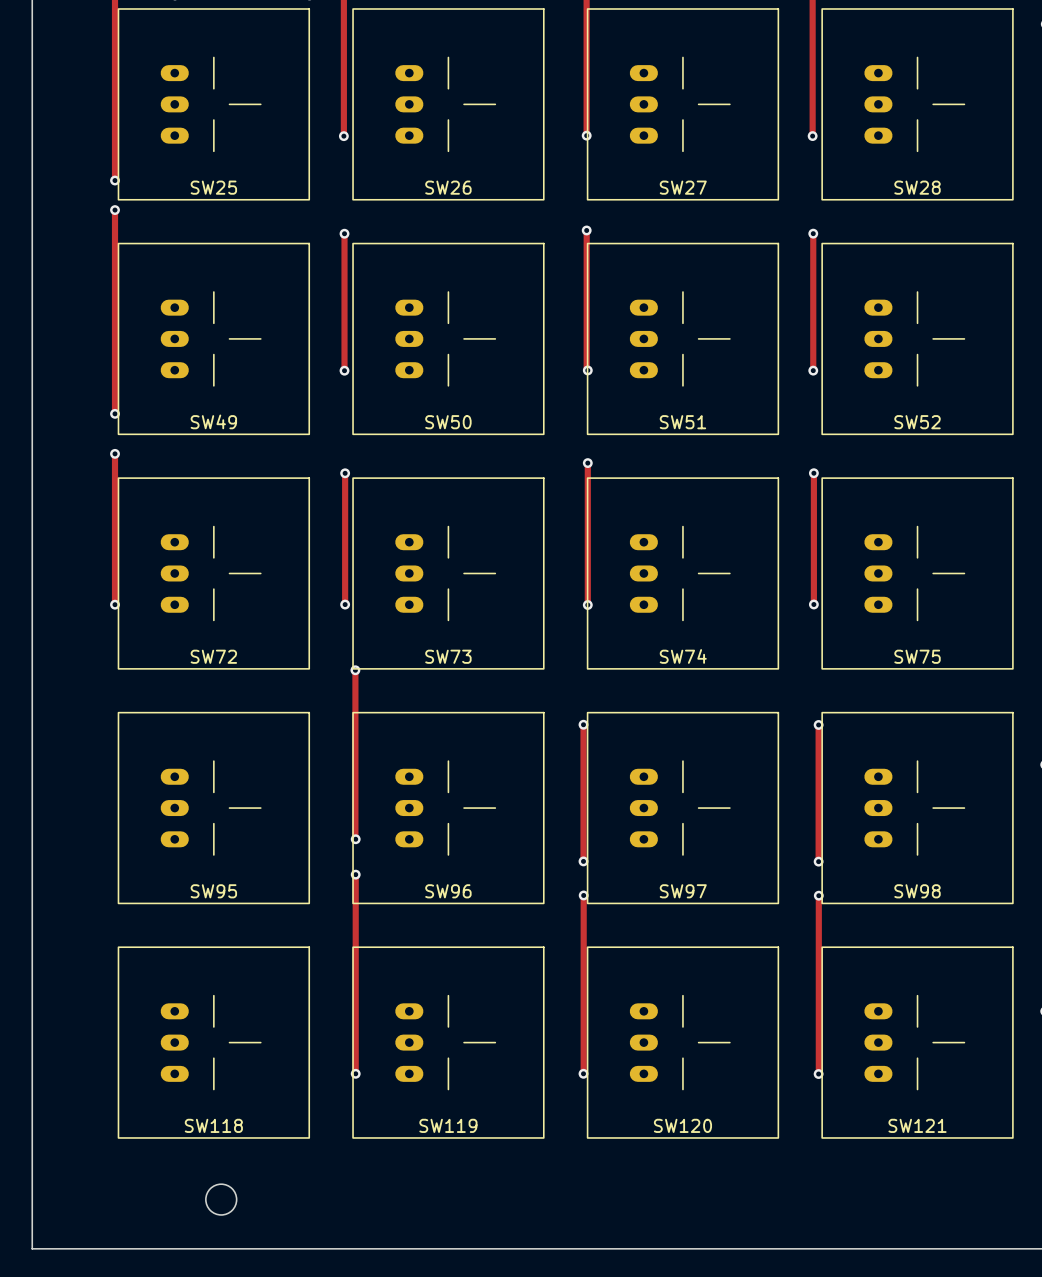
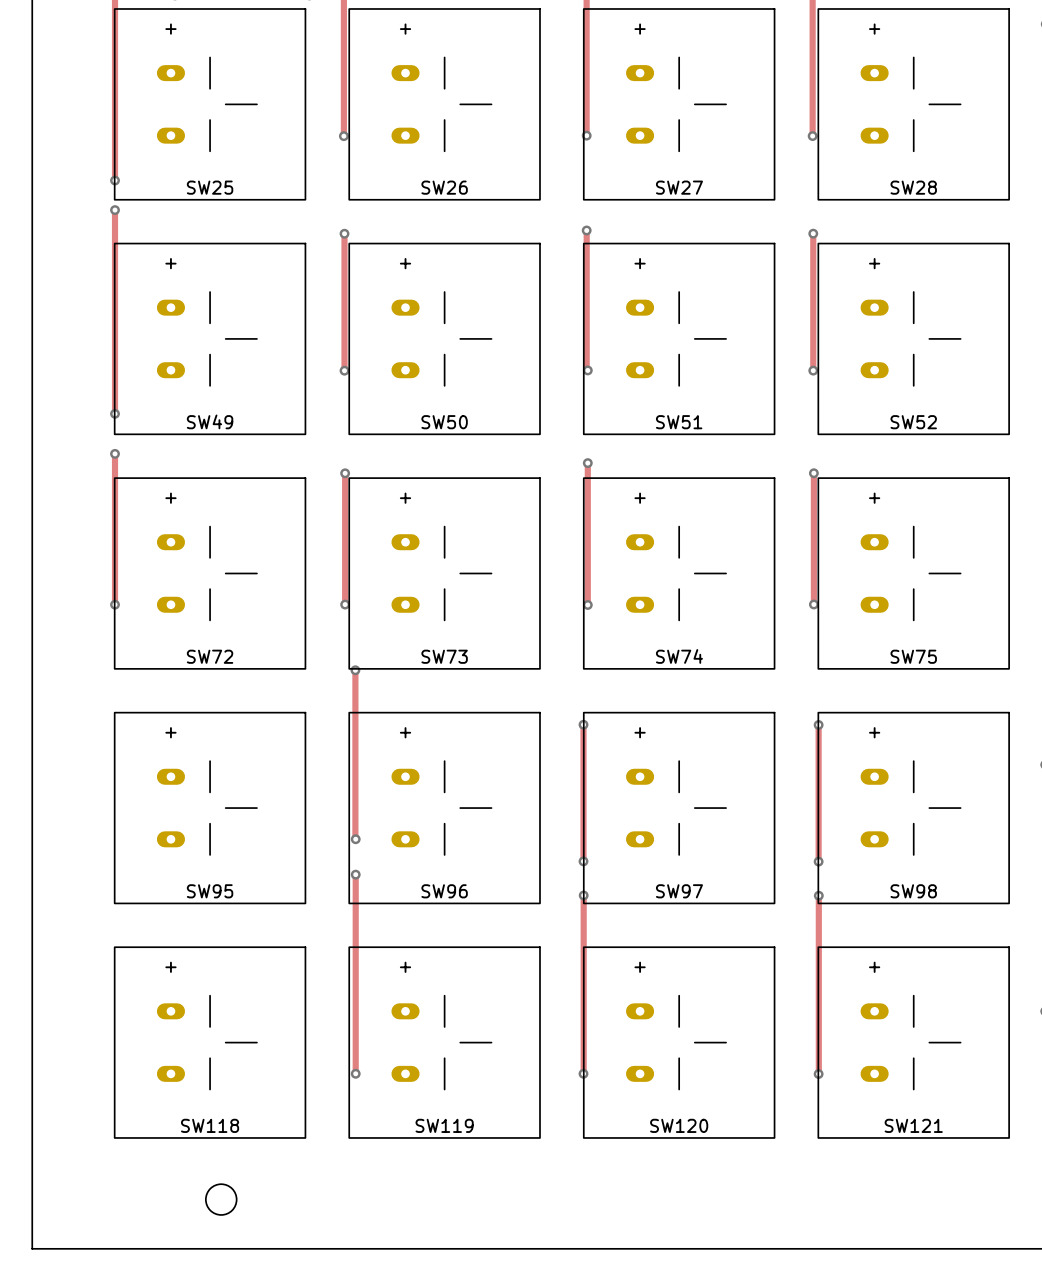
SW25 footprint: [117, 8, 310, 201] -> [113, 8, 307, 201]
SW26 footprint: [352, 8, 545, 201] -> [348, 8, 541, 201]
SW27 footprint: [586, 8, 780, 201] -> [583, 8, 776, 201]
SW28 footprint: [821, 8, 1014, 201] -> [817, 8, 1010, 201]
SW49 footprint: [117, 242, 310, 436] -> [113, 242, 307, 436]
SW50 footprint: [352, 242, 545, 436] -> [348, 242, 541, 436]
SW51 footprint: [586, 242, 780, 436] -> [583, 242, 776, 436]
SW52 footprint: [821, 242, 1014, 436] -> [817, 242, 1010, 436]
SW72 footprint: [117, 477, 310, 670] -> [113, 477, 307, 670]
SW73 footprint: [352, 477, 545, 670] -> [348, 477, 541, 670]
SW74 footprint: [586, 477, 780, 670] -> [583, 477, 776, 670]
SW75 footprint: [821, 477, 1014, 670] -> [817, 477, 1010, 670]
SW95 footprint: [117, 711, 310, 905] -> [113, 711, 307, 905]
SW96 footprint: [352, 711, 545, 905] -> [348, 711, 541, 905]
SW97 footprint: [586, 711, 780, 905] -> [583, 711, 776, 905]
SW98 footprint: [821, 711, 1014, 905] -> [817, 711, 1010, 905]
SW118 footprint: [117, 946, 310, 1139] -> [113, 946, 307, 1139]
SW119 footprint: [352, 946, 545, 1139] -> [348, 946, 541, 1139]
SW120 footprint: [586, 946, 780, 1139] -> [583, 946, 776, 1139]
SW121 footprint: [821, 946, 1014, 1139] -> [817, 946, 1010, 1139]

